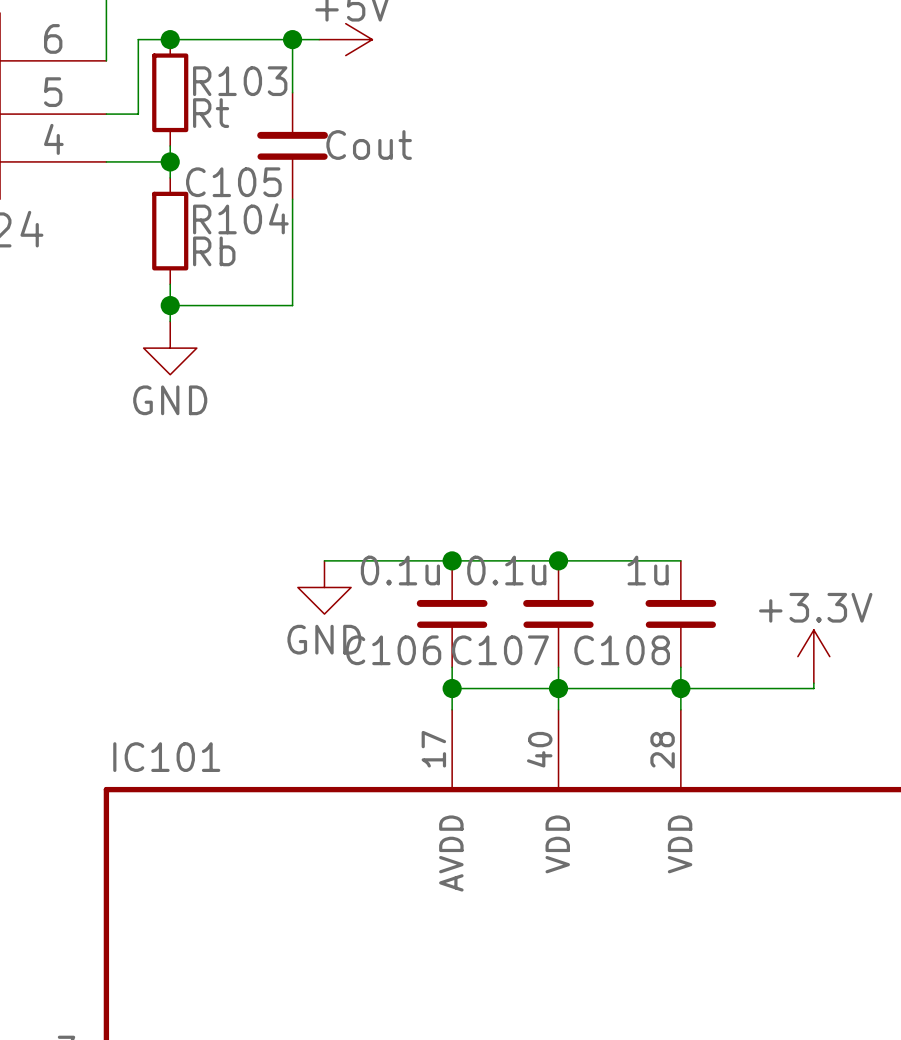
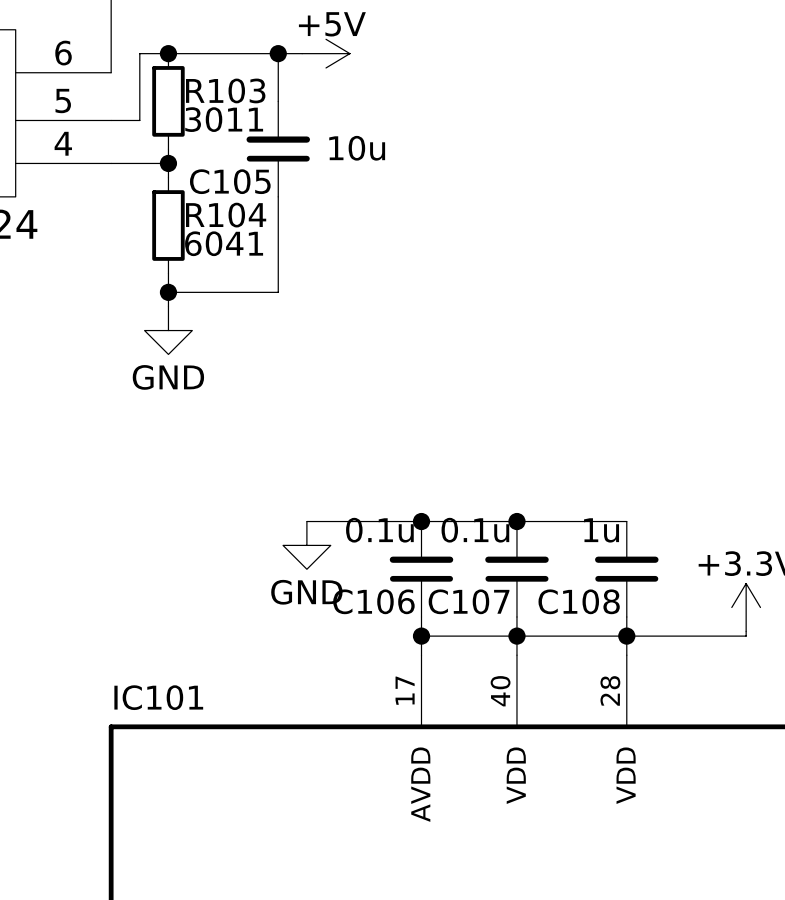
R103 value: Rt (211, 113) -> 3011 (224, 119)
C105 value: Cout (369, 145) -> 10u (357, 148)
R104 value: Rb (214, 251) -> 6041 (224, 243)

